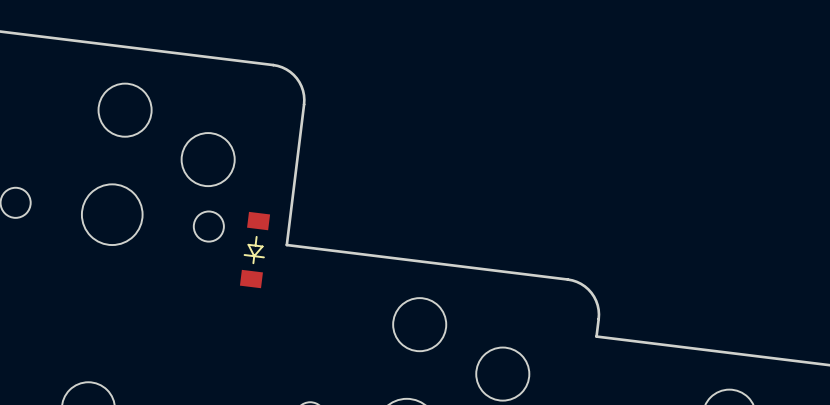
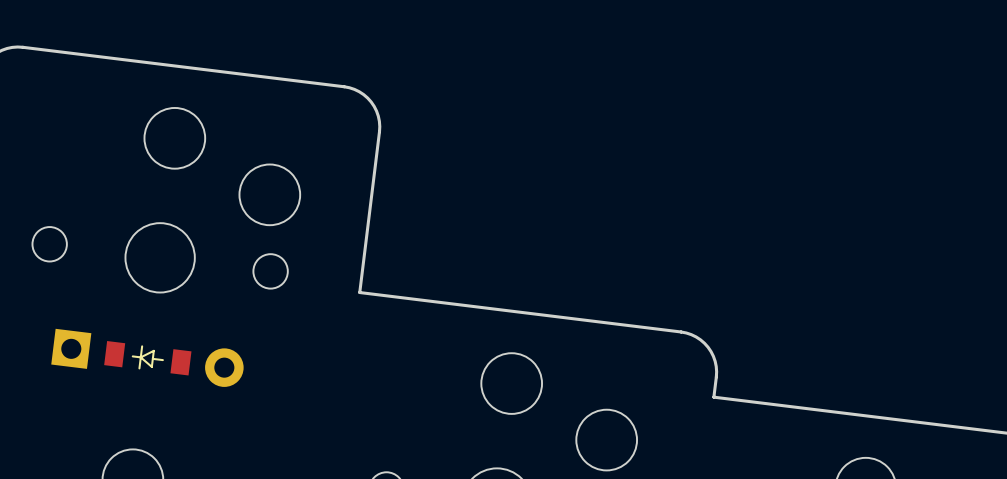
part: (255, 250) -> none
part: none -> (147, 357)

